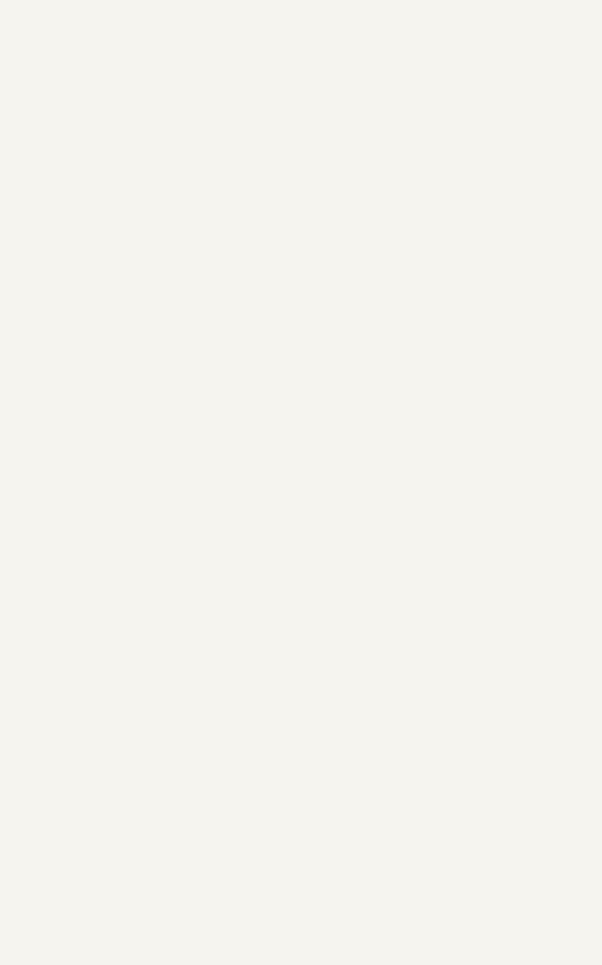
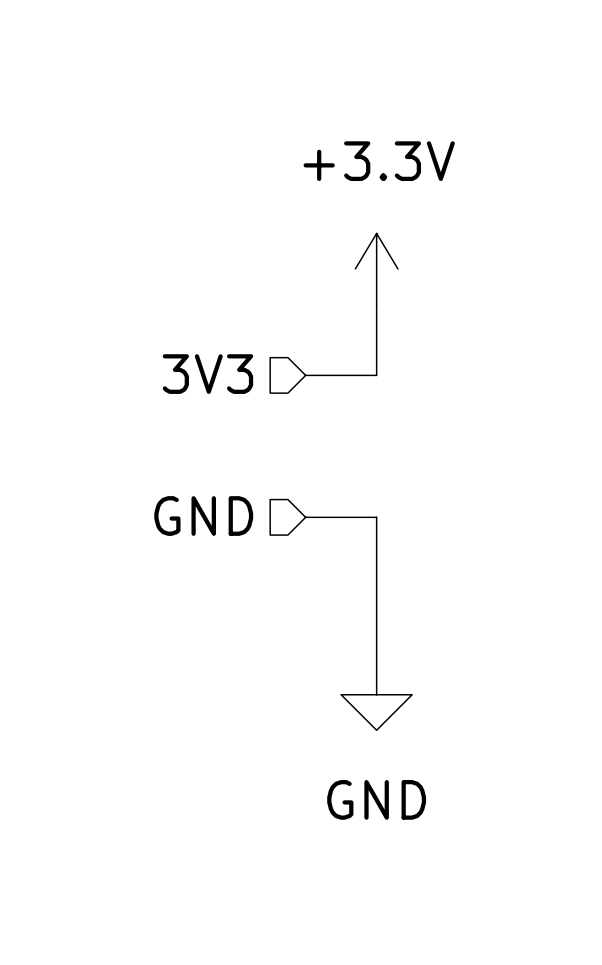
power symbol: none -> +3.3V (376, 268)
wire: none -> (376, 304) (376, 375) (305, 375)
hierarchical label: none -> 3V3 (207, 374)
hierarchical label: none -> GND (203, 516)
wire: none -> (305, 517) (376, 517) (376, 659)
power symbol: none -> GND (376, 694)

